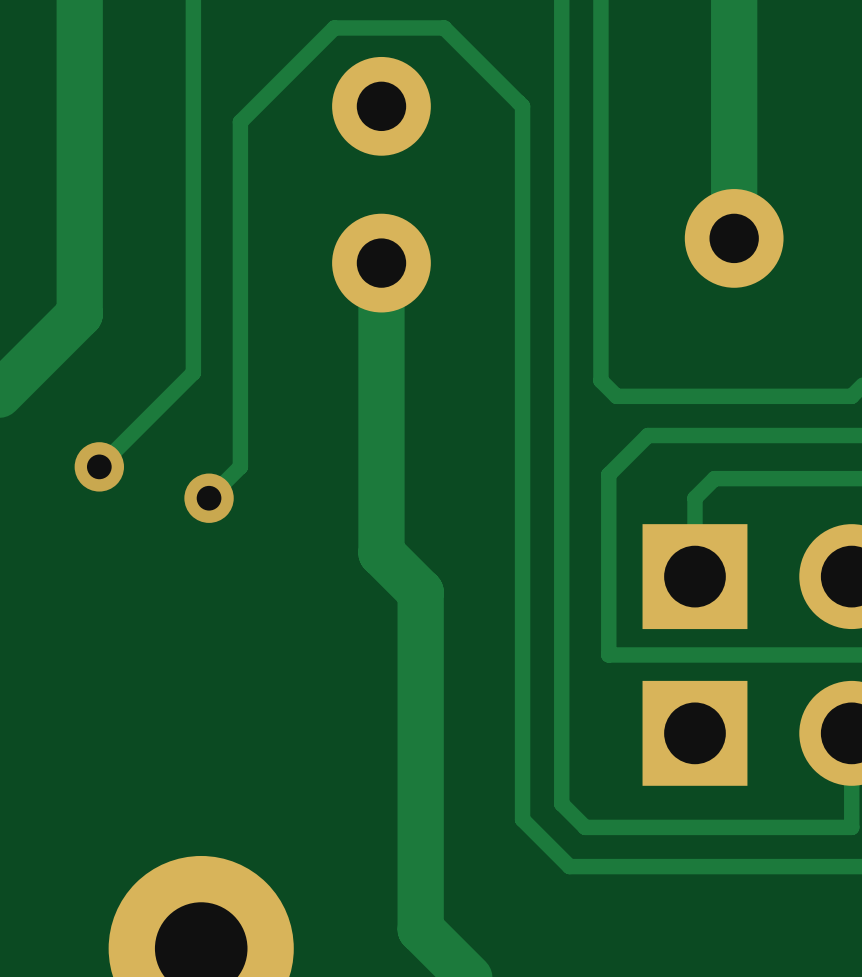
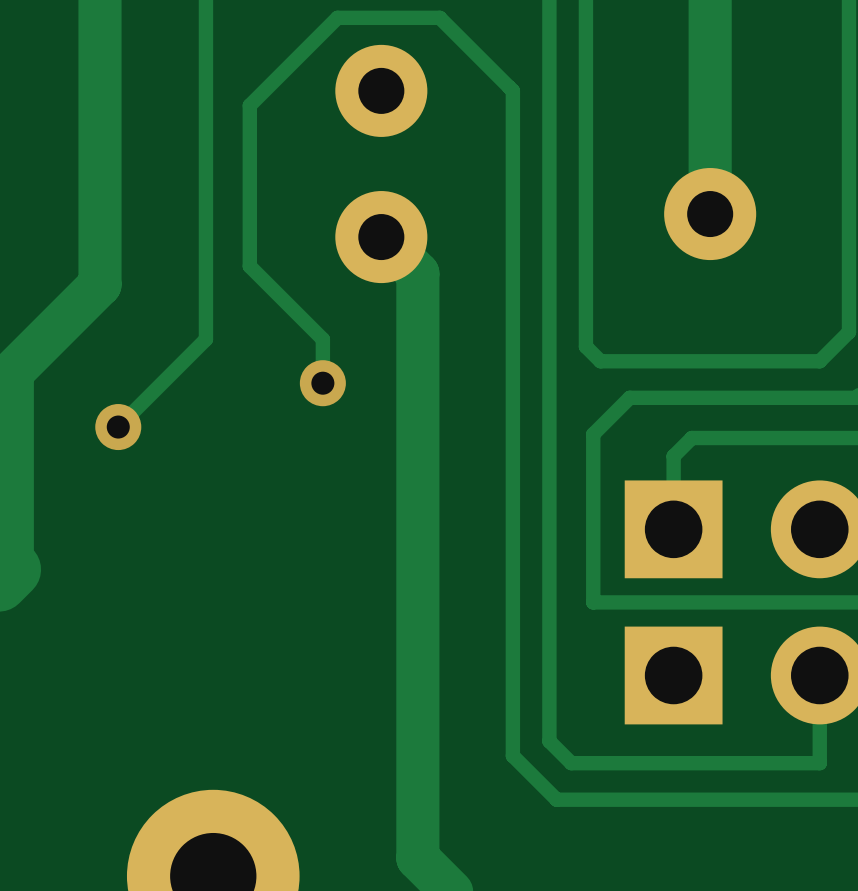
track: (381, 263) (381, 553) (420, 592) -> (381, 237) (417, 273) (417, 543)
track: (240, 294) (240, 466) (209, 498) -> (249, 266) (322, 339) (322, 383)
via position: (209, 498) -> (322, 383)

